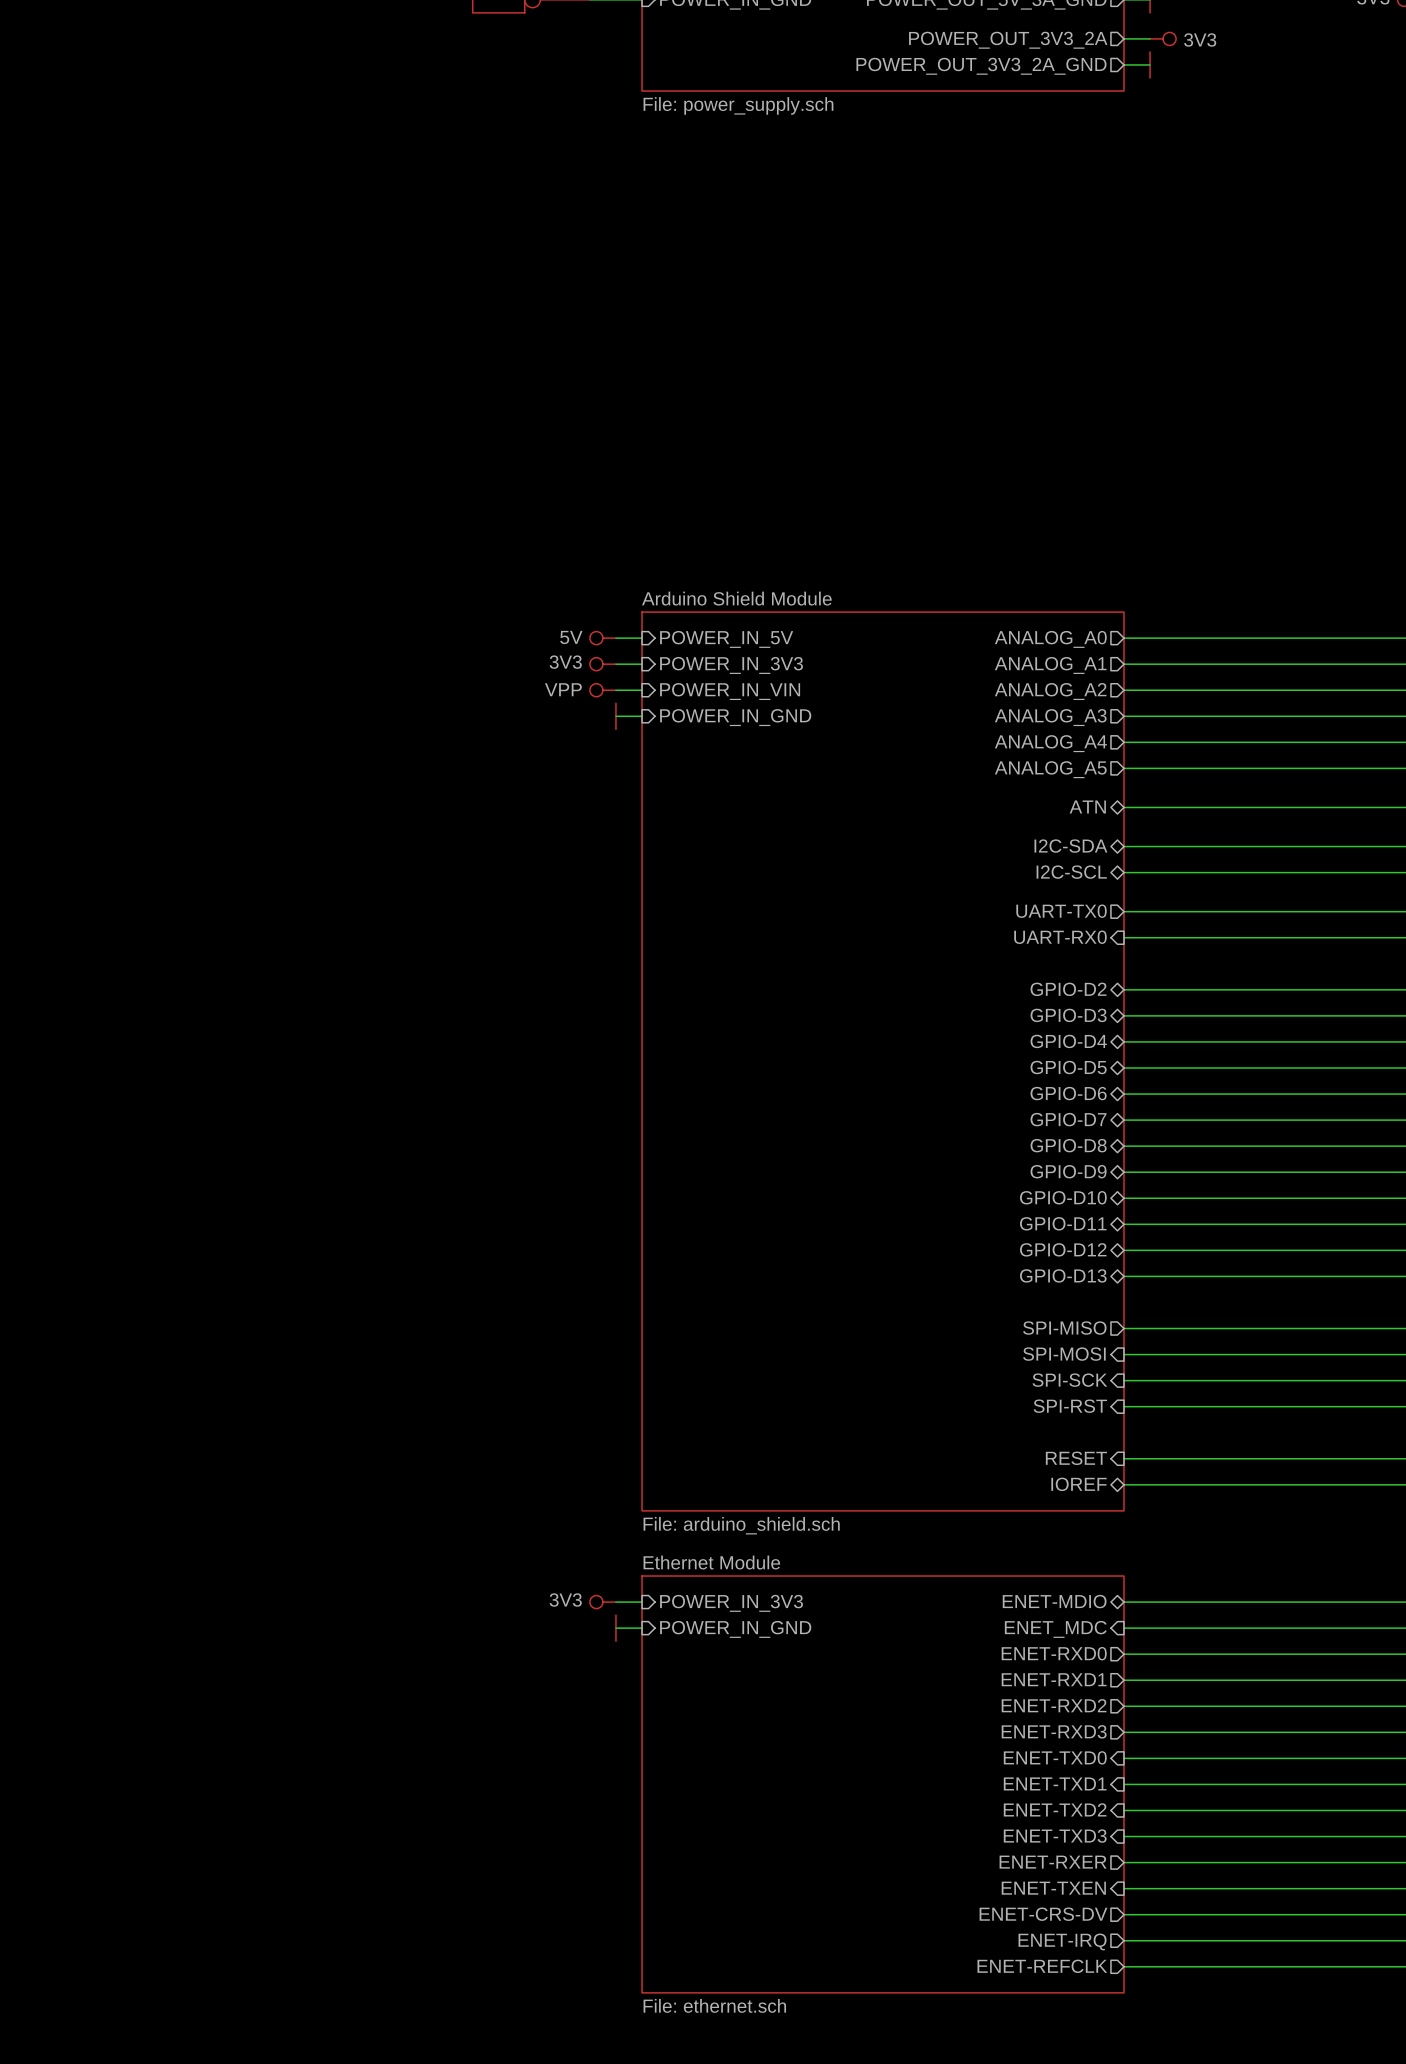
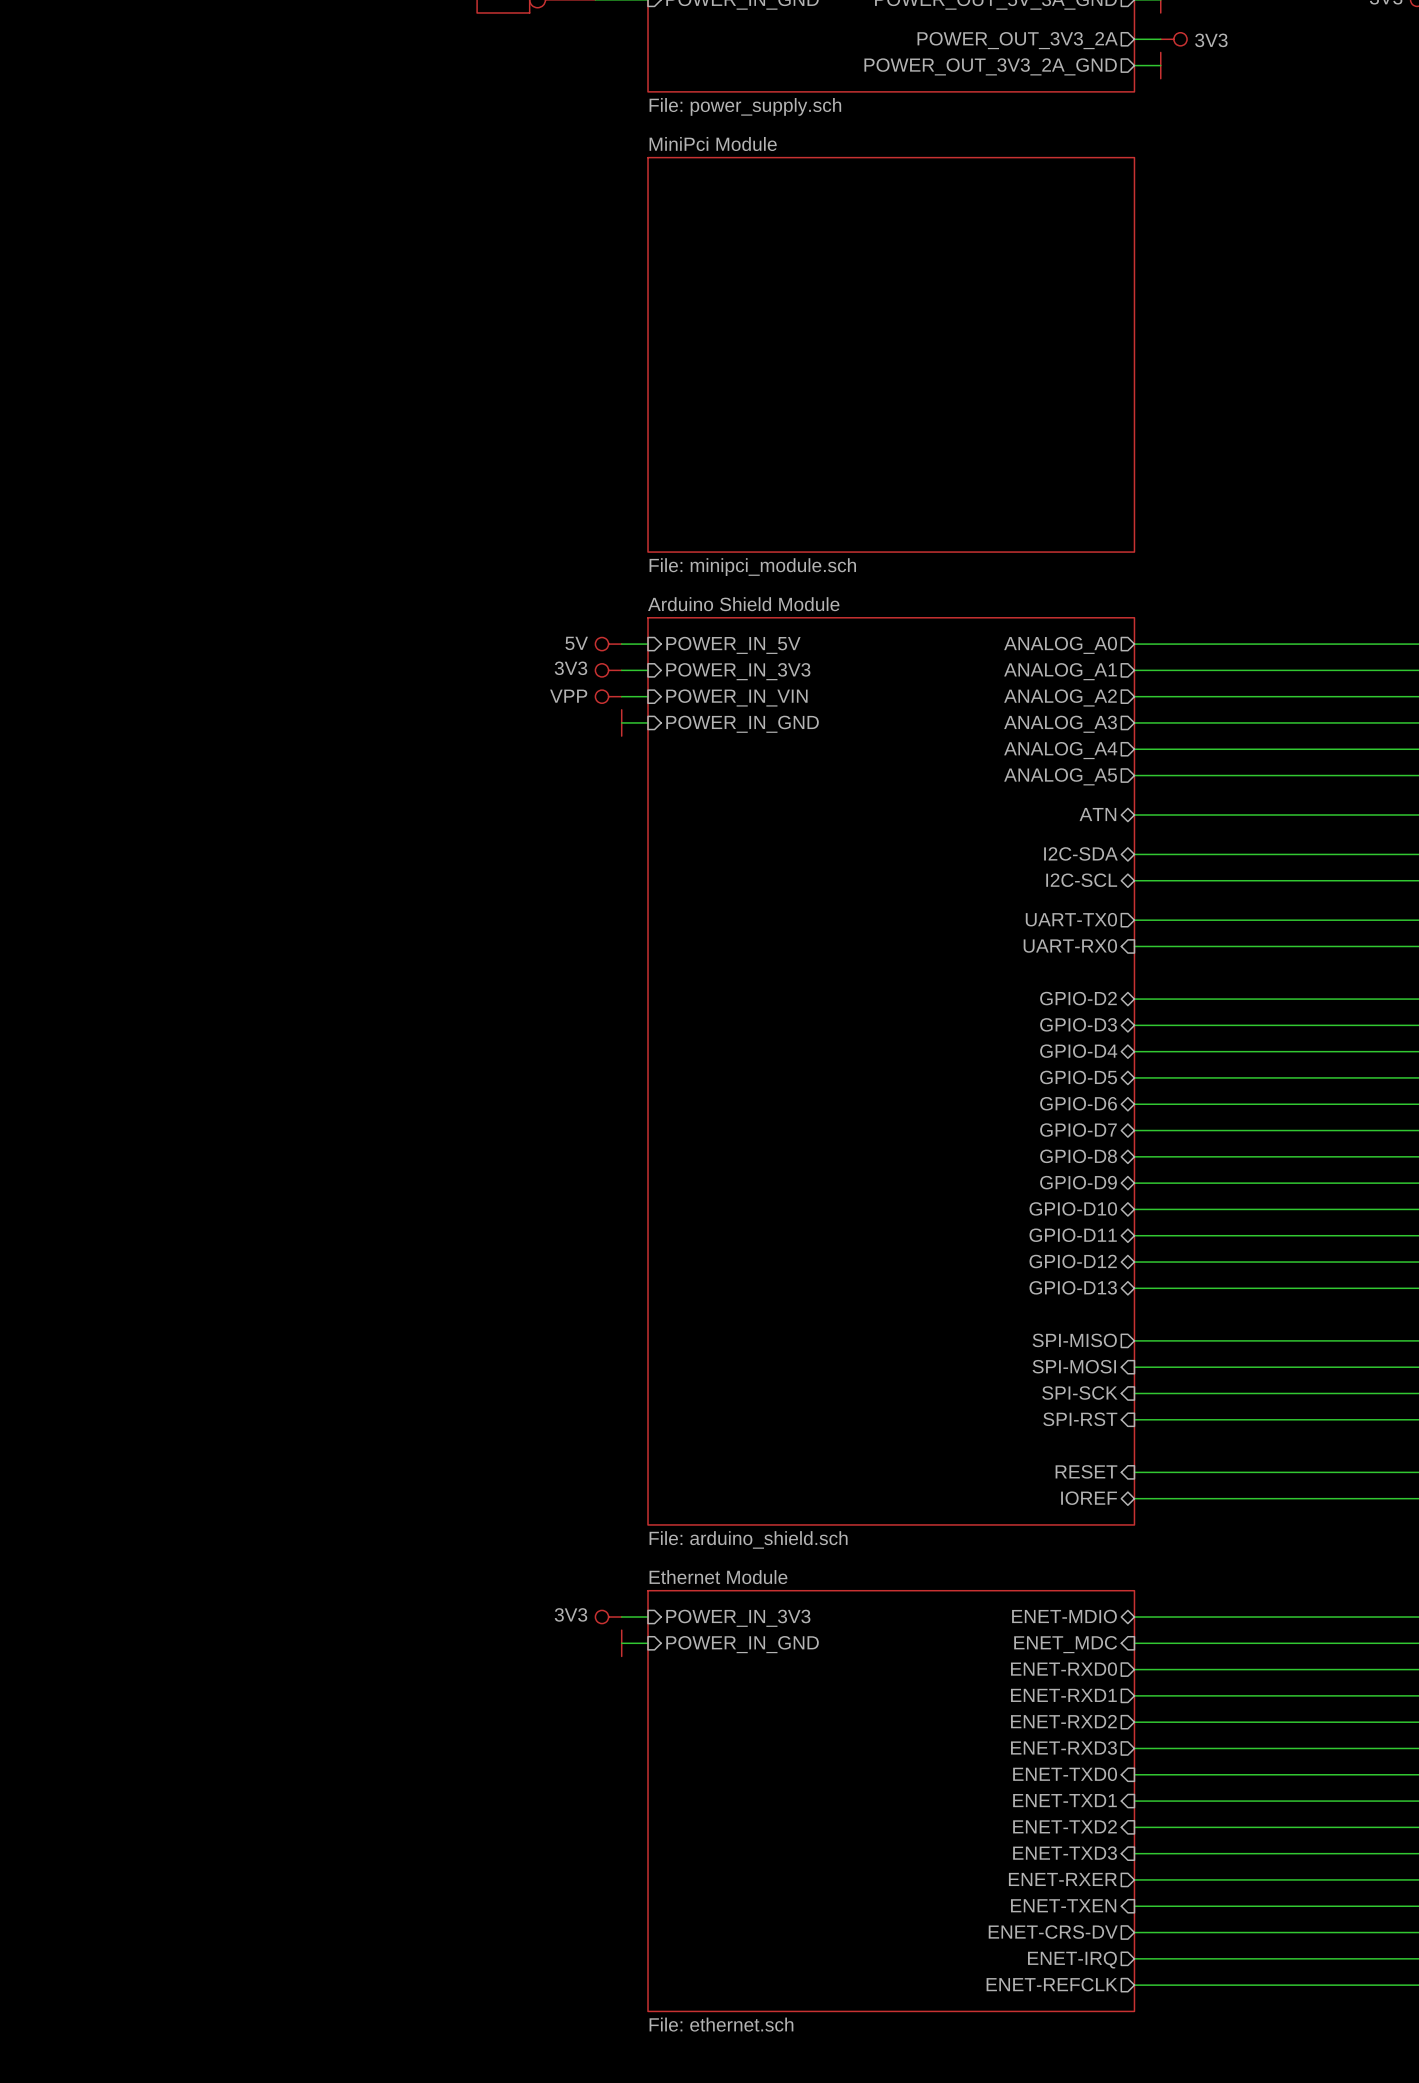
sheet MiniPci Module: none -> File: minipci_module.sch (891, 354)

